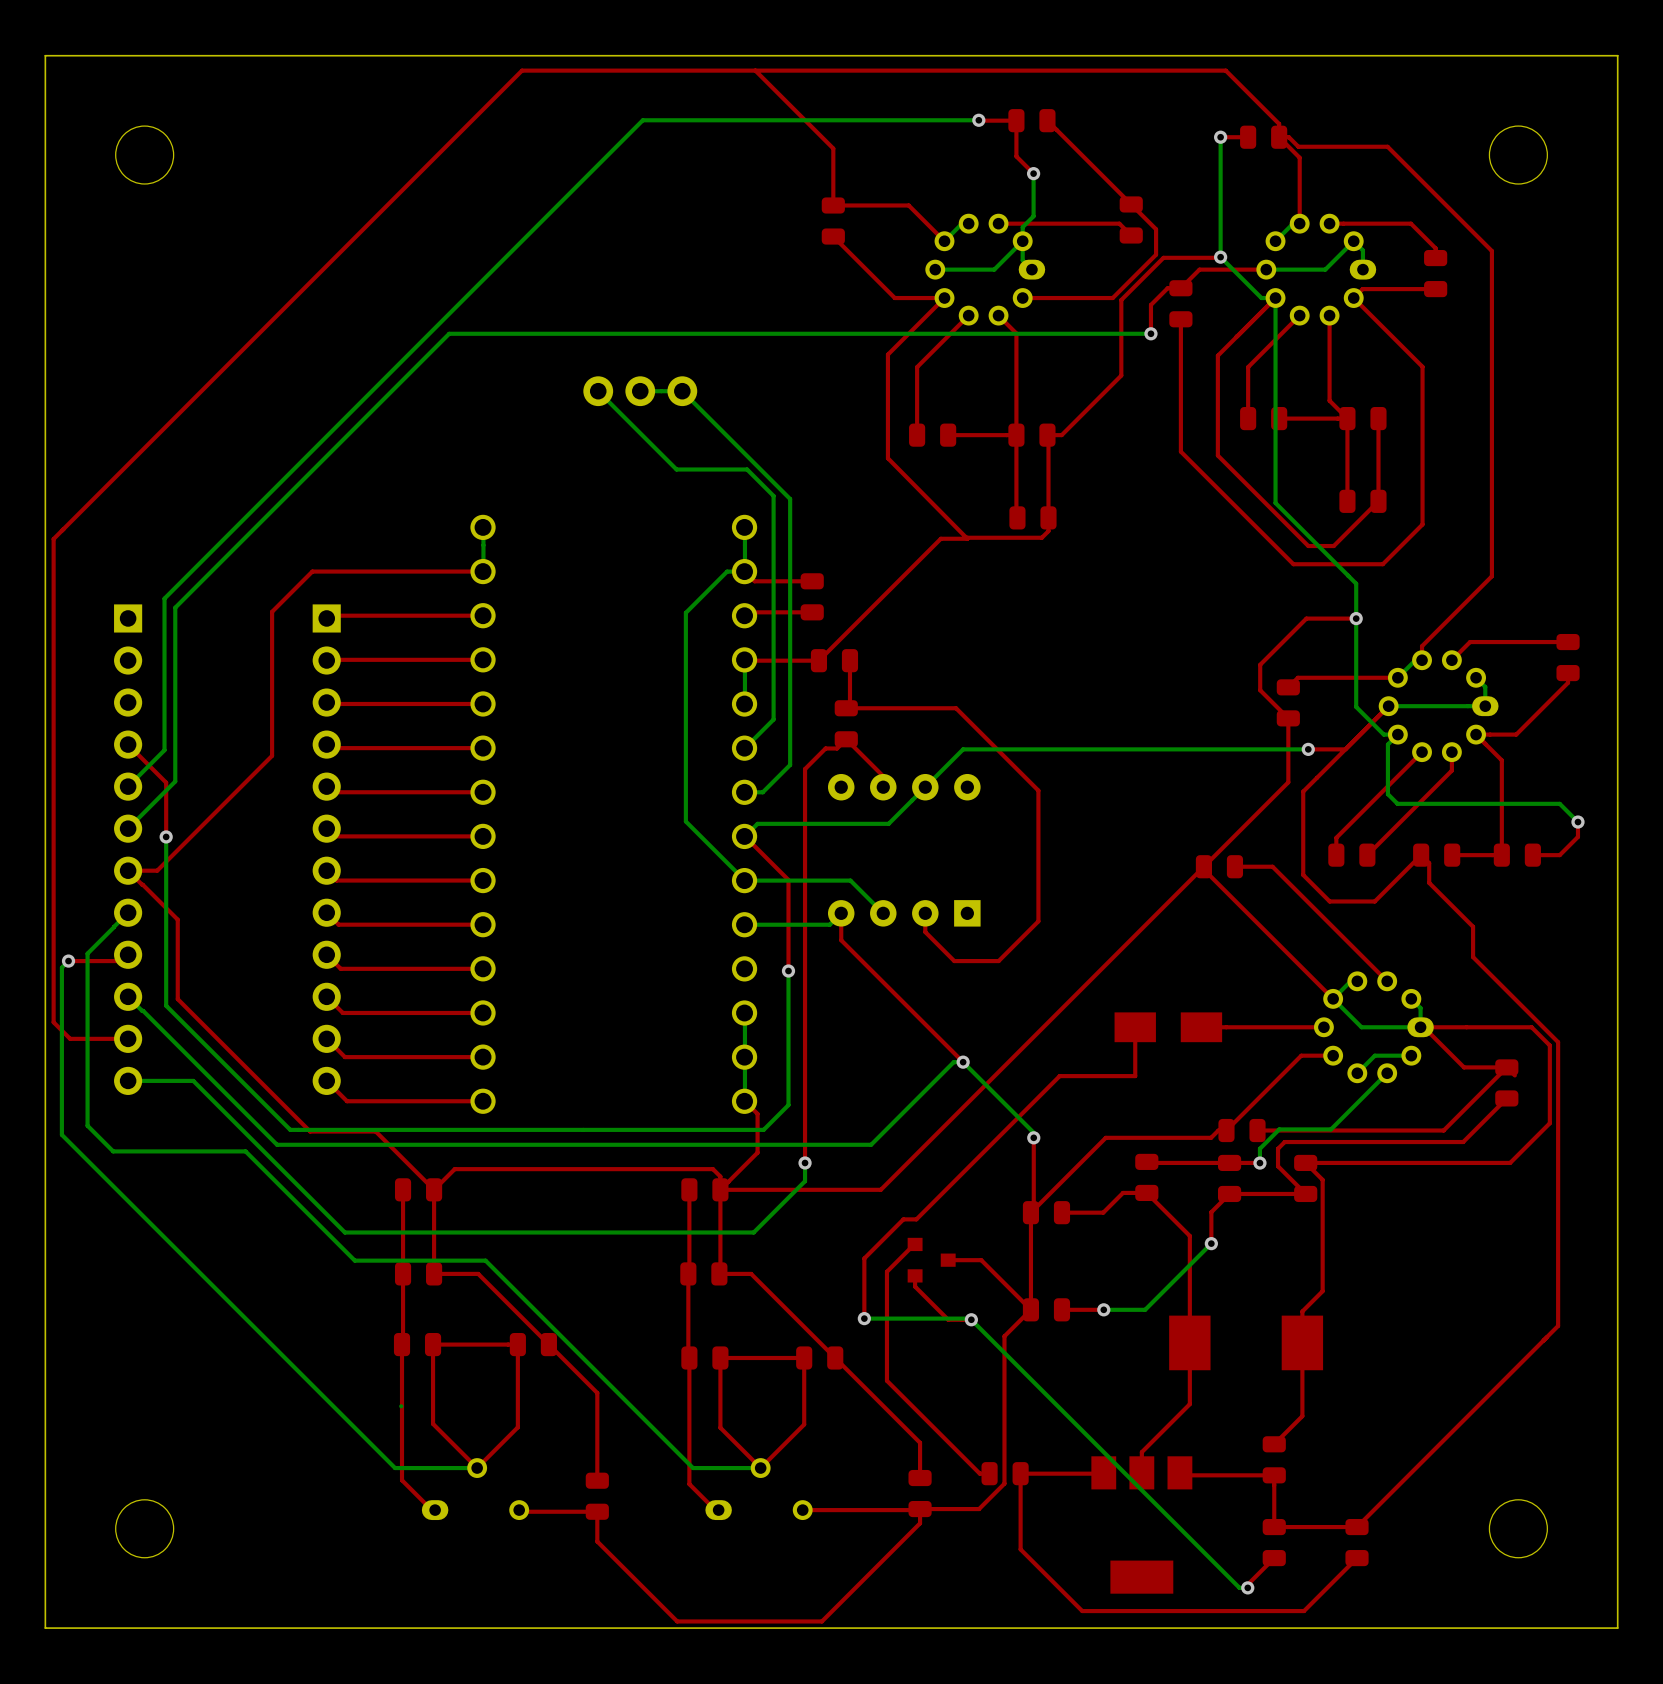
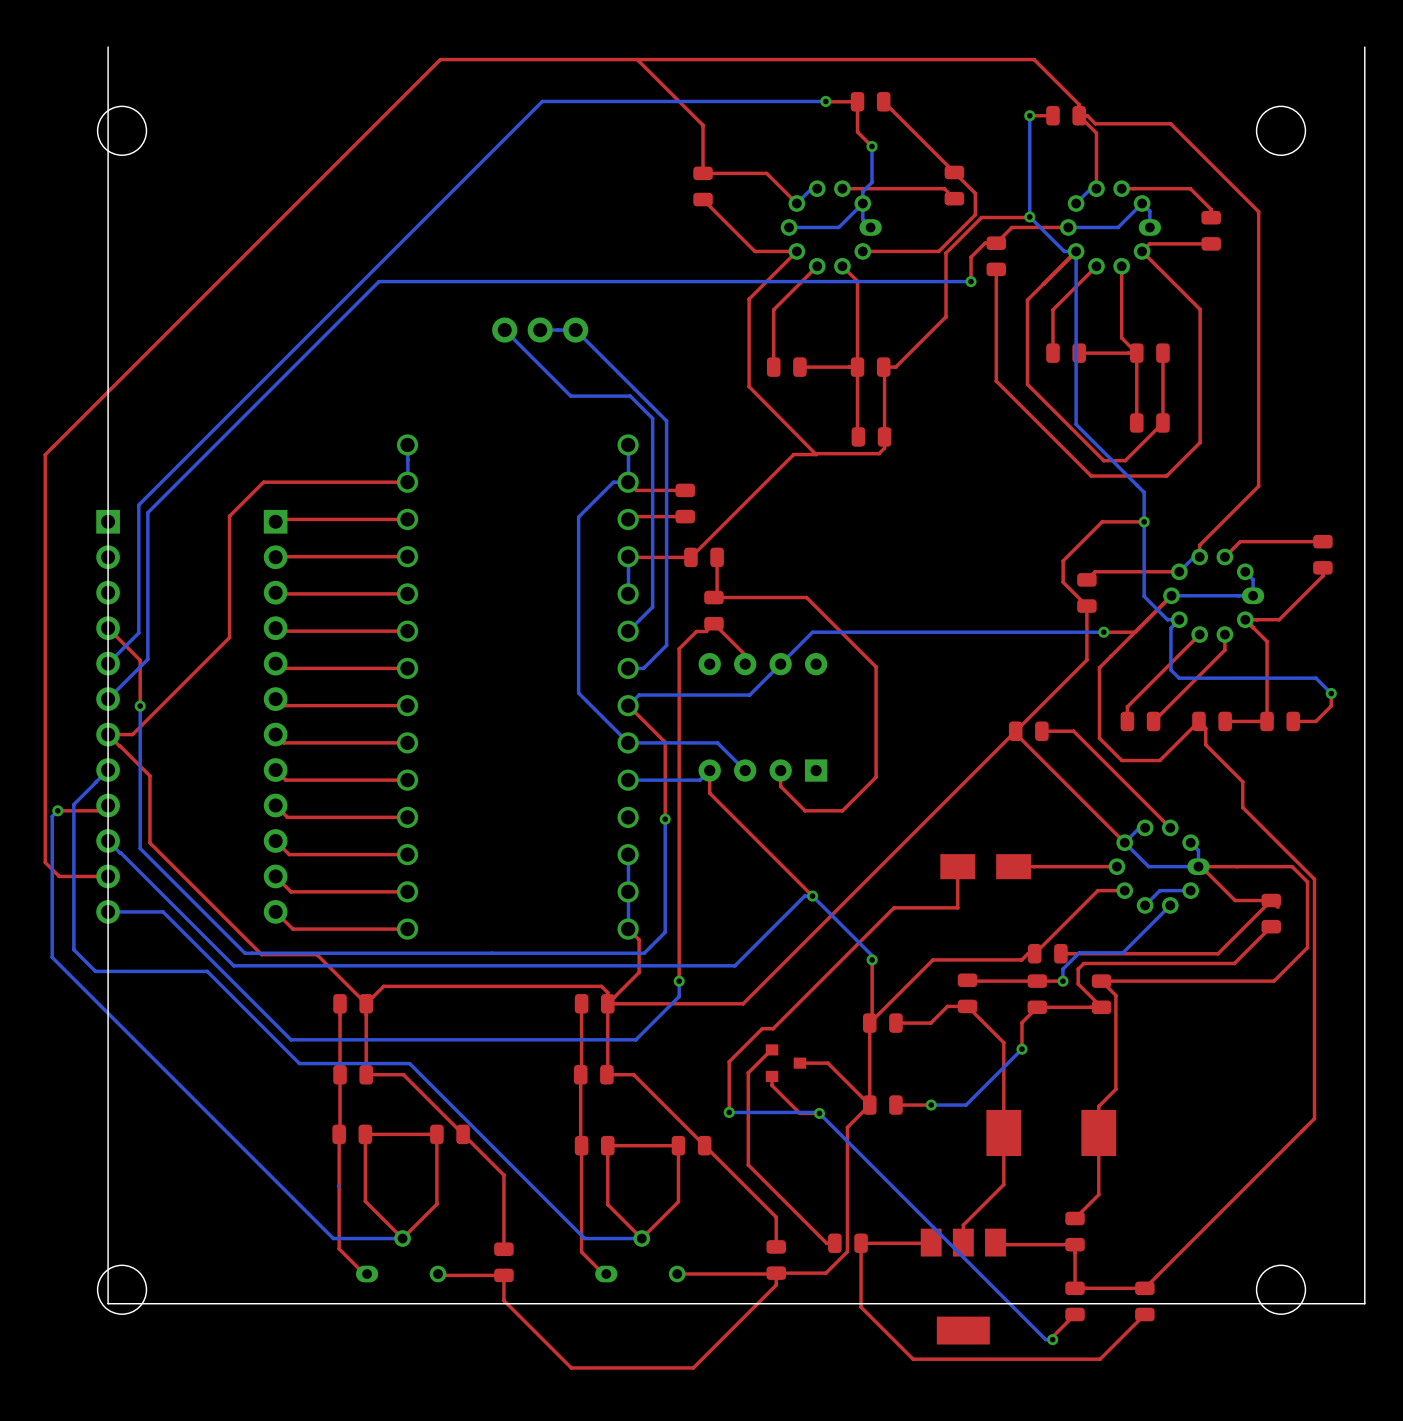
board edge: (1617, 55) (45, 55) (45, 1628) (1617, 1628) (1617, 1545) -> (108, 47) (108, 1303) (1364, 1303)

